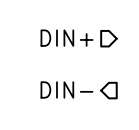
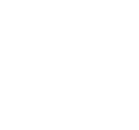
hierarchical label: DIN+ (66, 38) -> none
hierarchical label: DIN- (66, 89) -> none

